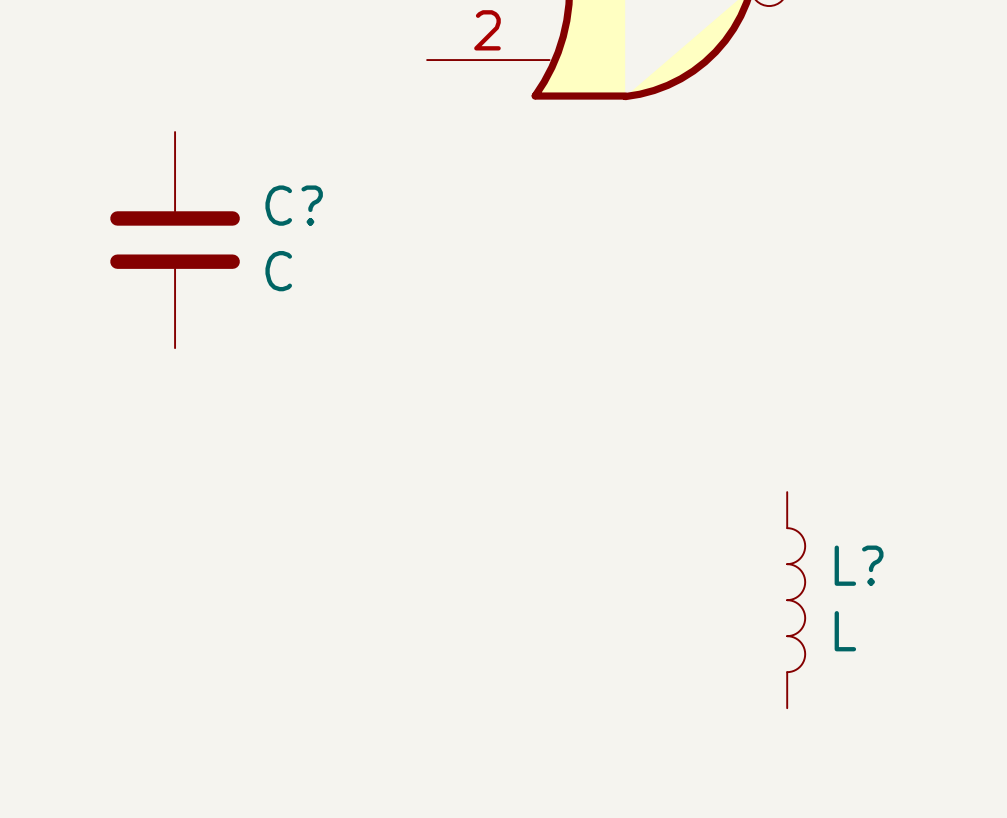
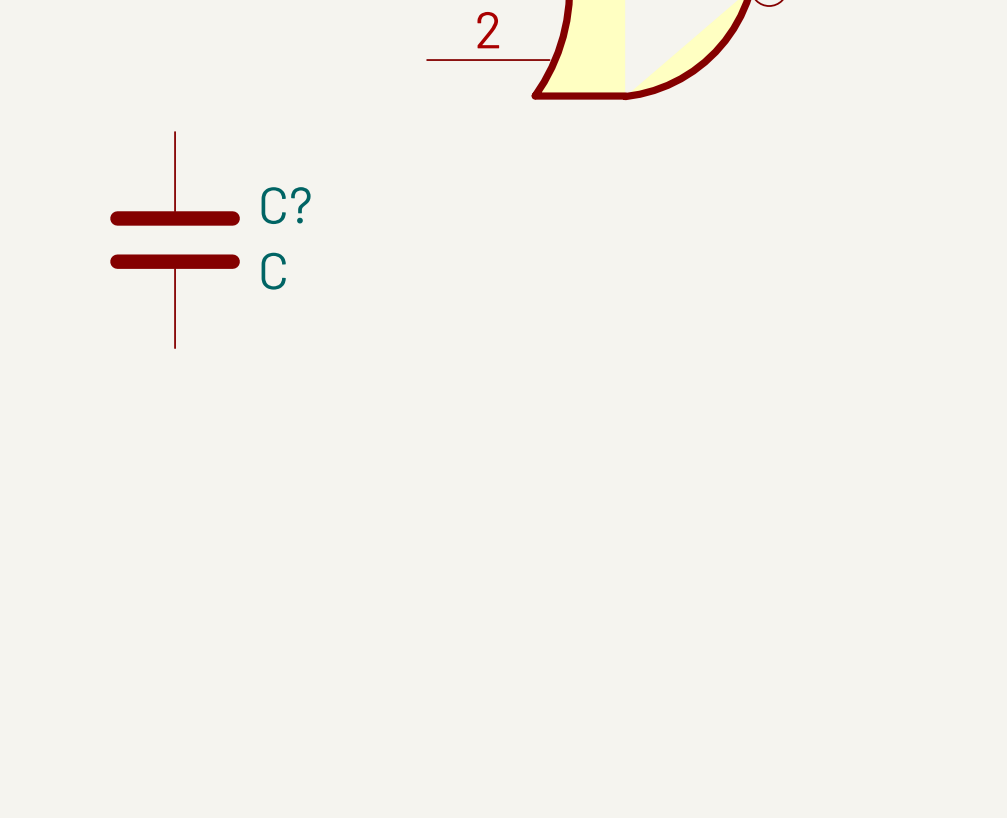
L?: L (796, 600) -> none

